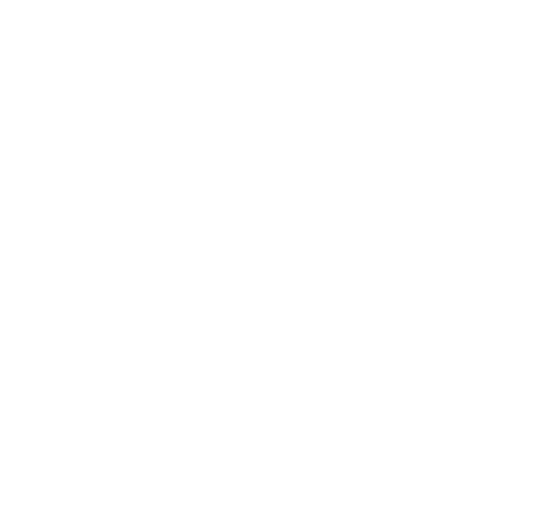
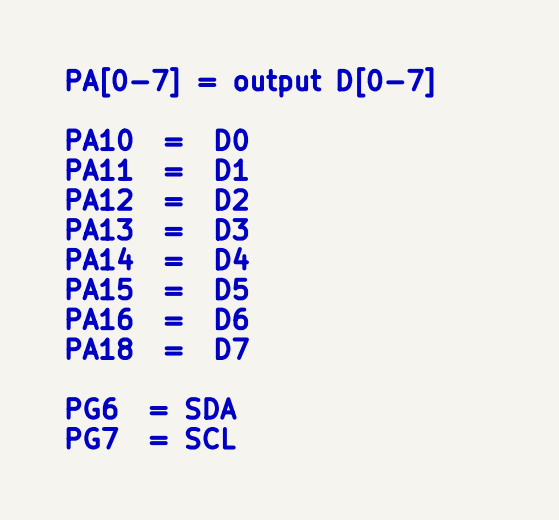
text: none -> PA[0-7] = output D[0-7] (250, 82)
text: none -> PA10 = D0 (157, 139)
text: none -> PA11 = D1 (157, 169)
text: none -> PA12 = D2 (157, 199)
text: none -> PA13 = D3 (157, 229)
text: none -> PA14 = D4 (157, 258)
text: none -> PA15 = D5 (157, 289)
text: none -> PA16 = D6 (157, 318)
text: none -> PA18 = D7 (157, 348)
text: none -> PG6 = SDA (151, 408)
text: none -> PG7 = SCL (151, 438)

